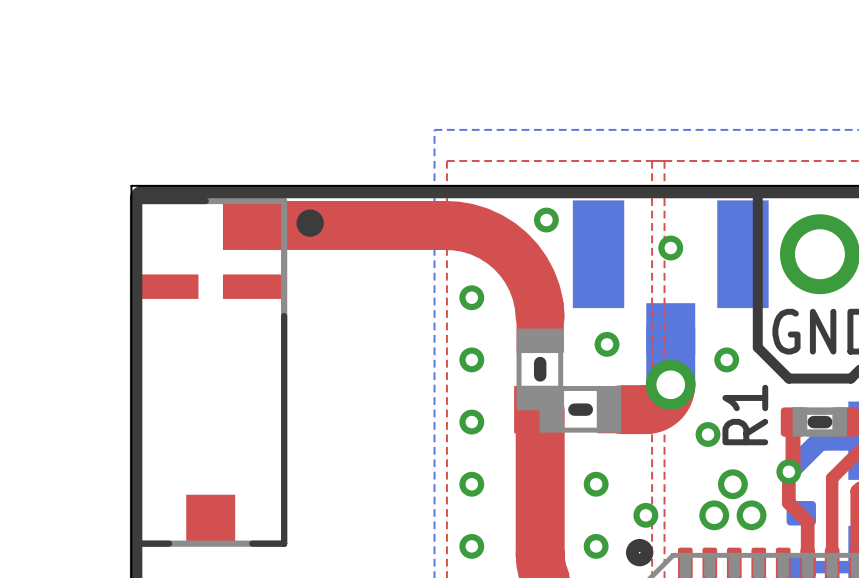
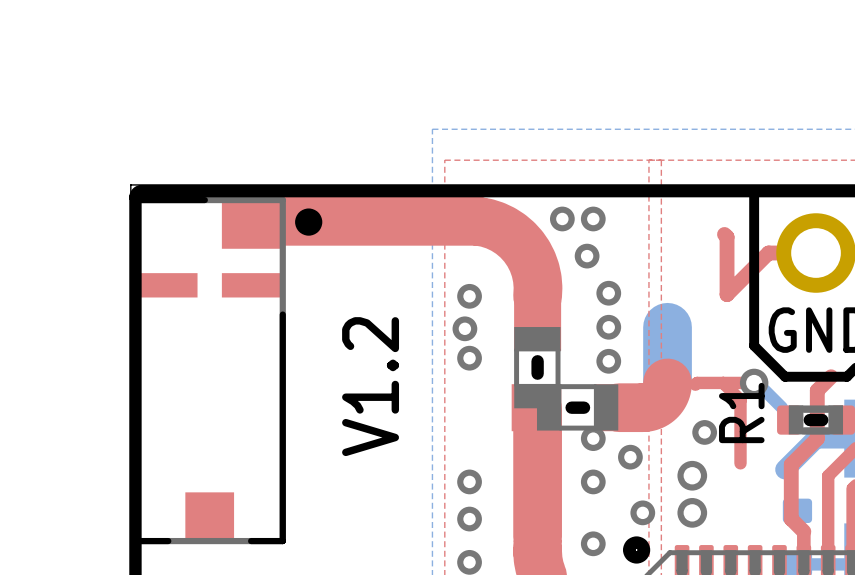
via position: (546, 220) -> (562, 218)
via: none -> (593, 218)
top track: none -> (258, 221) (478, 221) (486, 222) (510, 234) (528, 253) (537, 278) (537, 300)
top track: (253, 225) (443, 225) (467, 227) (479, 231) (500, 243) (518, 259) (526, 269) (536, 292) (540, 327) -> none
top track: none -> (724, 234) (727, 237) (727, 294) (768, 253) (831, 253)
via: (670, 248) -> none
via: none -> (587, 256)
part: (670, 277) -> none
via: none -> (608, 293)
via: none -> (608, 327)
via: none -> (464, 328)
via: (607, 344) -> none
via: (726, 359) -> none
via: none -> (608, 361)
via: (670, 384) -> none
top track: none -> (723, 382) (740, 400) (740, 463)
bottom track: none -> (754, 382) (757, 382) (781, 407)
top track: none -> (754, 382) (697, 382) (695, 384)
via: none -> (754, 382)
text: none -> V1.2 (370, 386)
via: (471, 422) -> none
top track: (793, 422) (793, 467) (788, 471) (788, 502) (807, 521) (807, 534) -> (831, 376) (817, 390) (817, 438) (791, 464) (791, 519) (803, 531)
via: none -> (593, 438)
via: none -> (630, 457)
via: (788, 471) -> none
via: none -> (692, 475)
via: (732, 484) -> none
via position: (714, 515) -> (692, 512)
via: (751, 515) -> none
via: none -> (469, 519)
via: (471, 546) -> none
via: none -> (469, 562)

